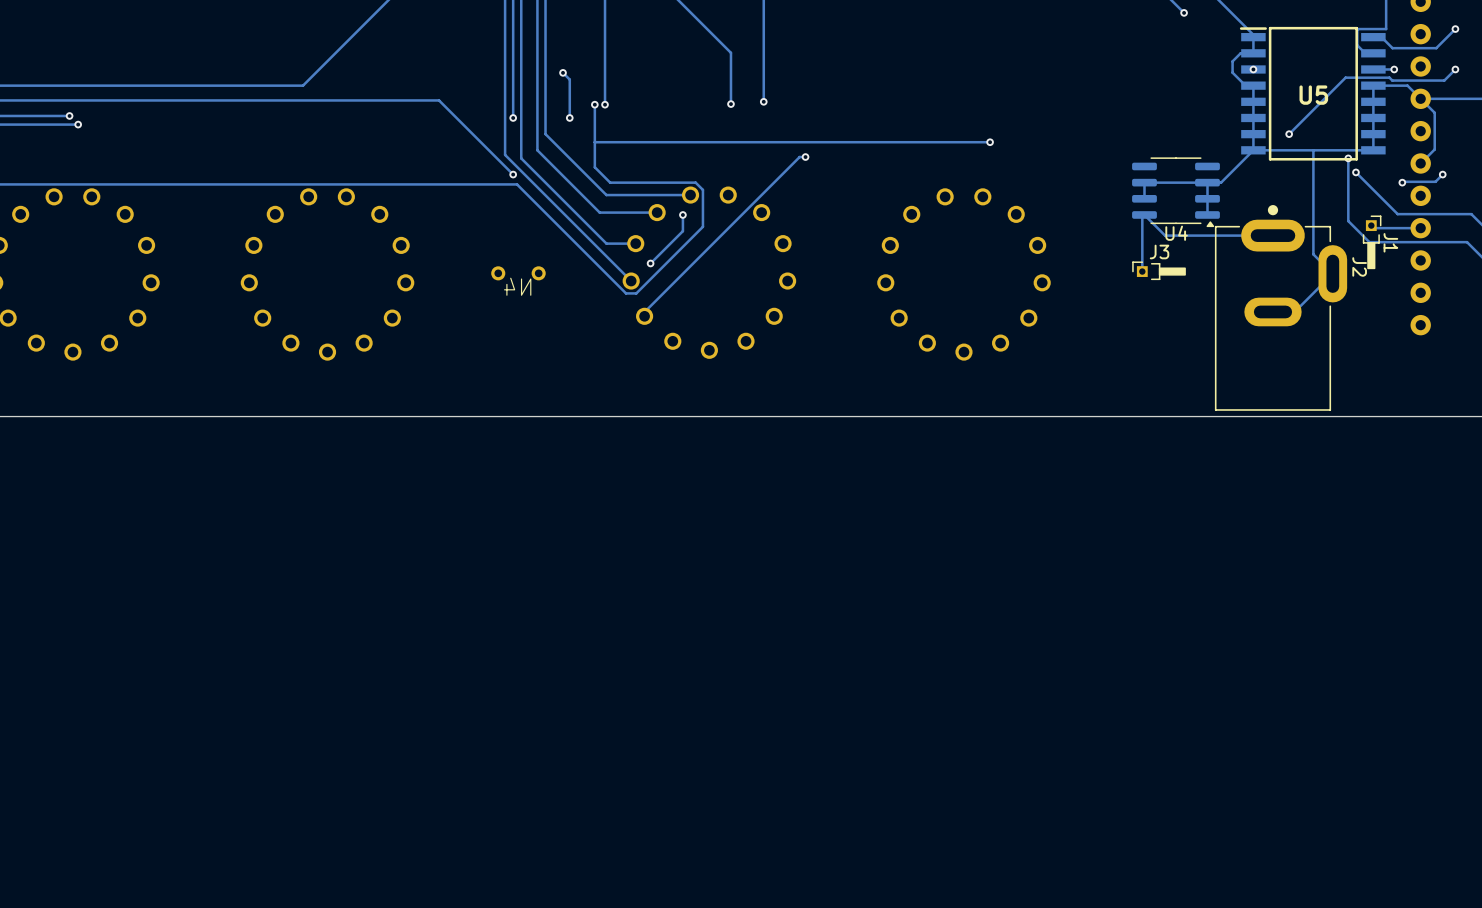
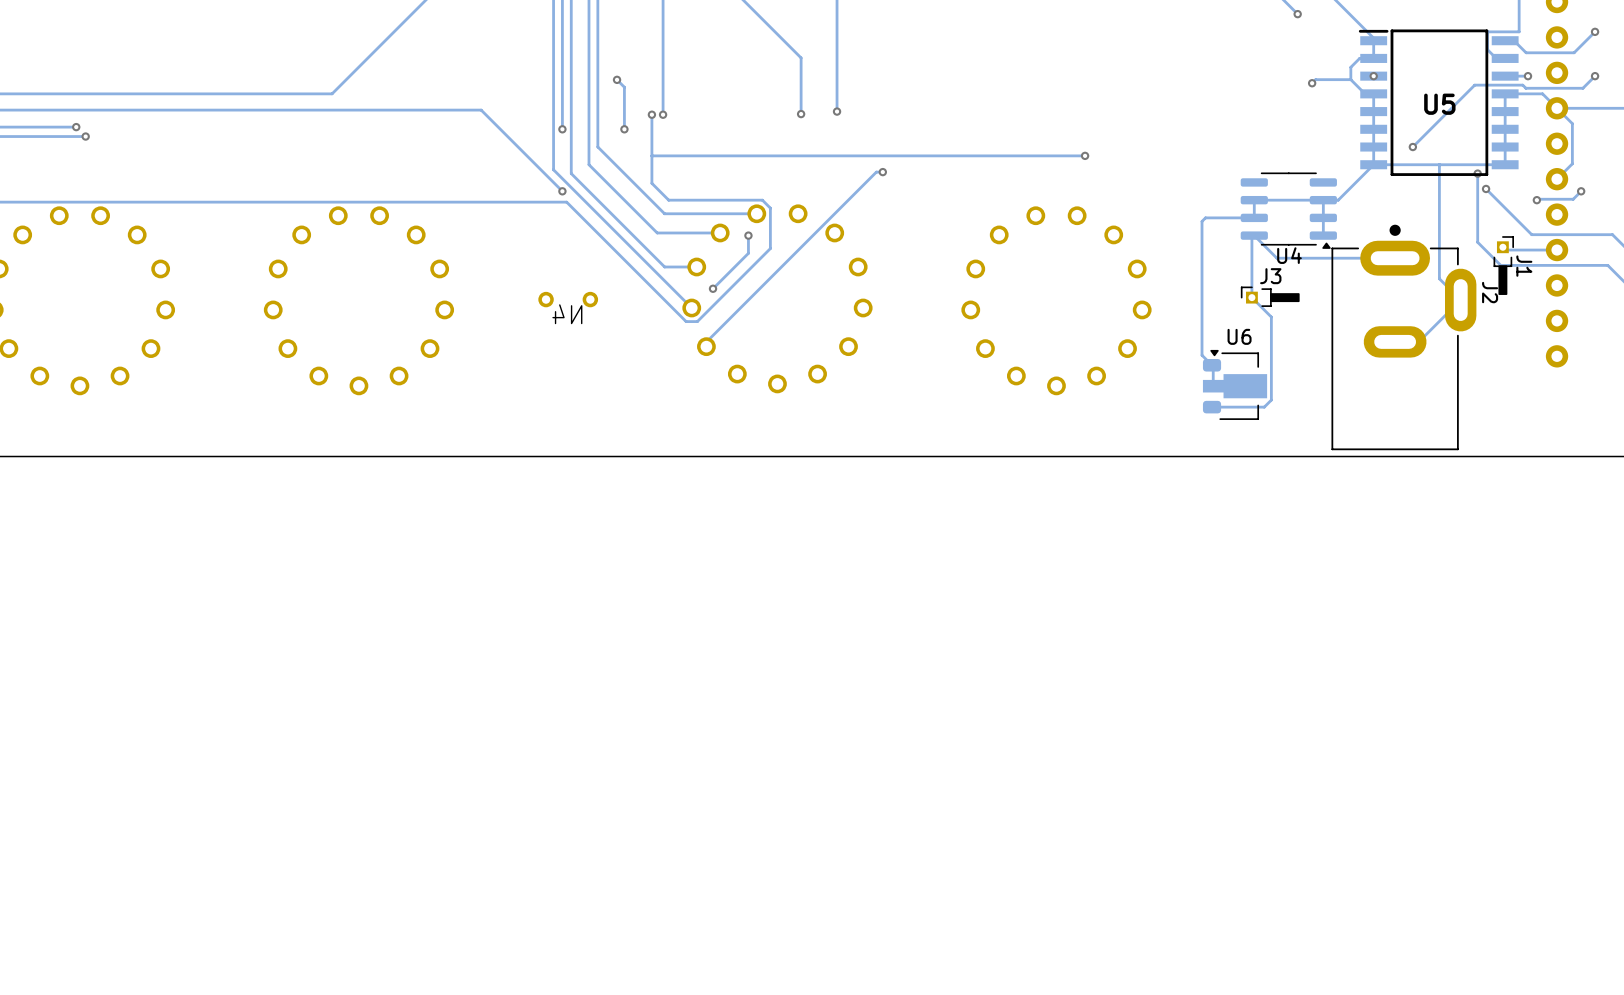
track: none -> (1350, 79) (1315, 79) (1312, 83)
via: none -> (1312, 83)
track: none -> (1254, 217) (1205, 217) (1202, 221) (1202, 355) (1213, 366) (1213, 386)
track: none -> (1251, 297) (1271, 317) (1271, 400) (1264, 407) (1212, 407)
U6: none -> (1235, 384)

